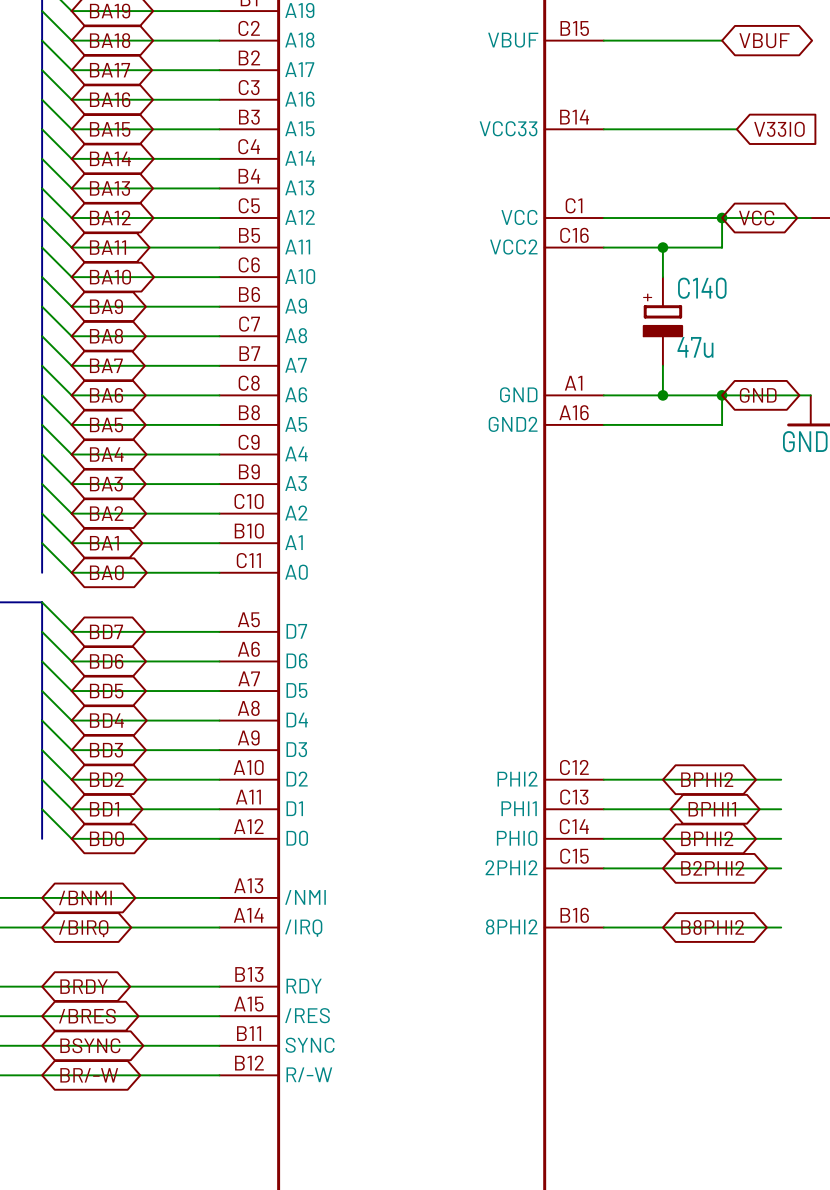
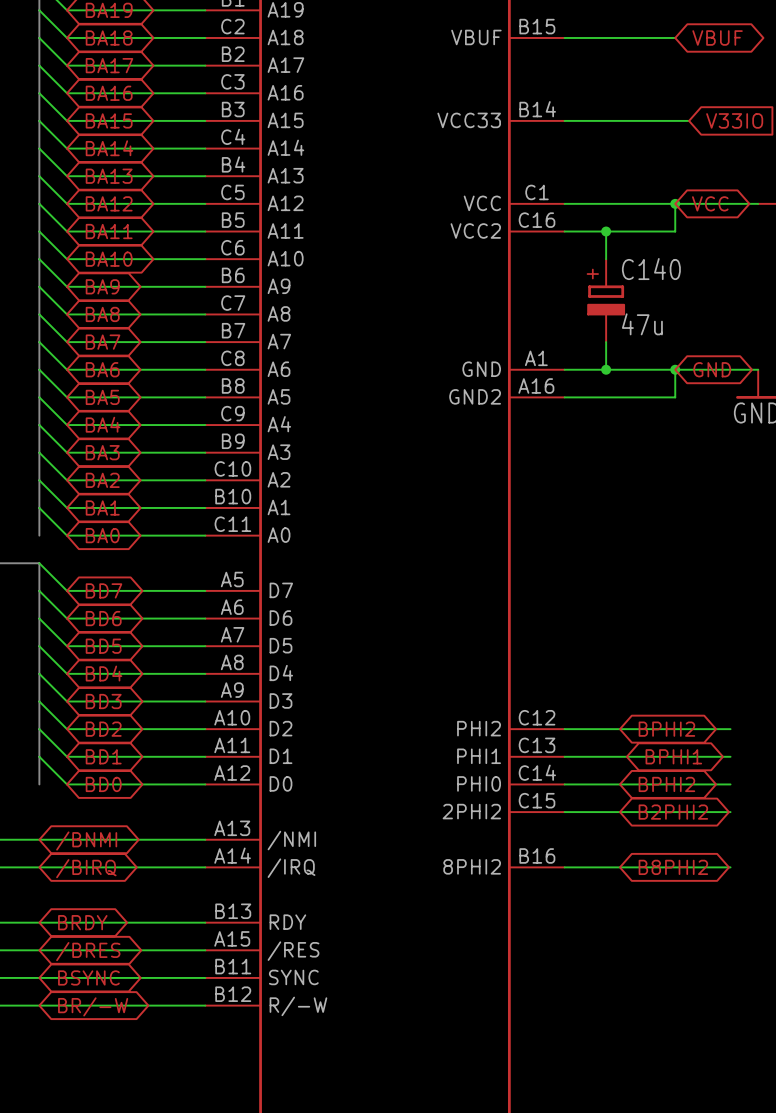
wire: (662, 247) (662, 277) -> (606, 231) (606, 259)
junction position: (662, 247) -> (606, 231)
C140 position: (662, 321) -> (606, 300)
wire: (662, 365) (662, 395) -> (606, 342) (606, 369)
junction position: (662, 395) -> (606, 369)

